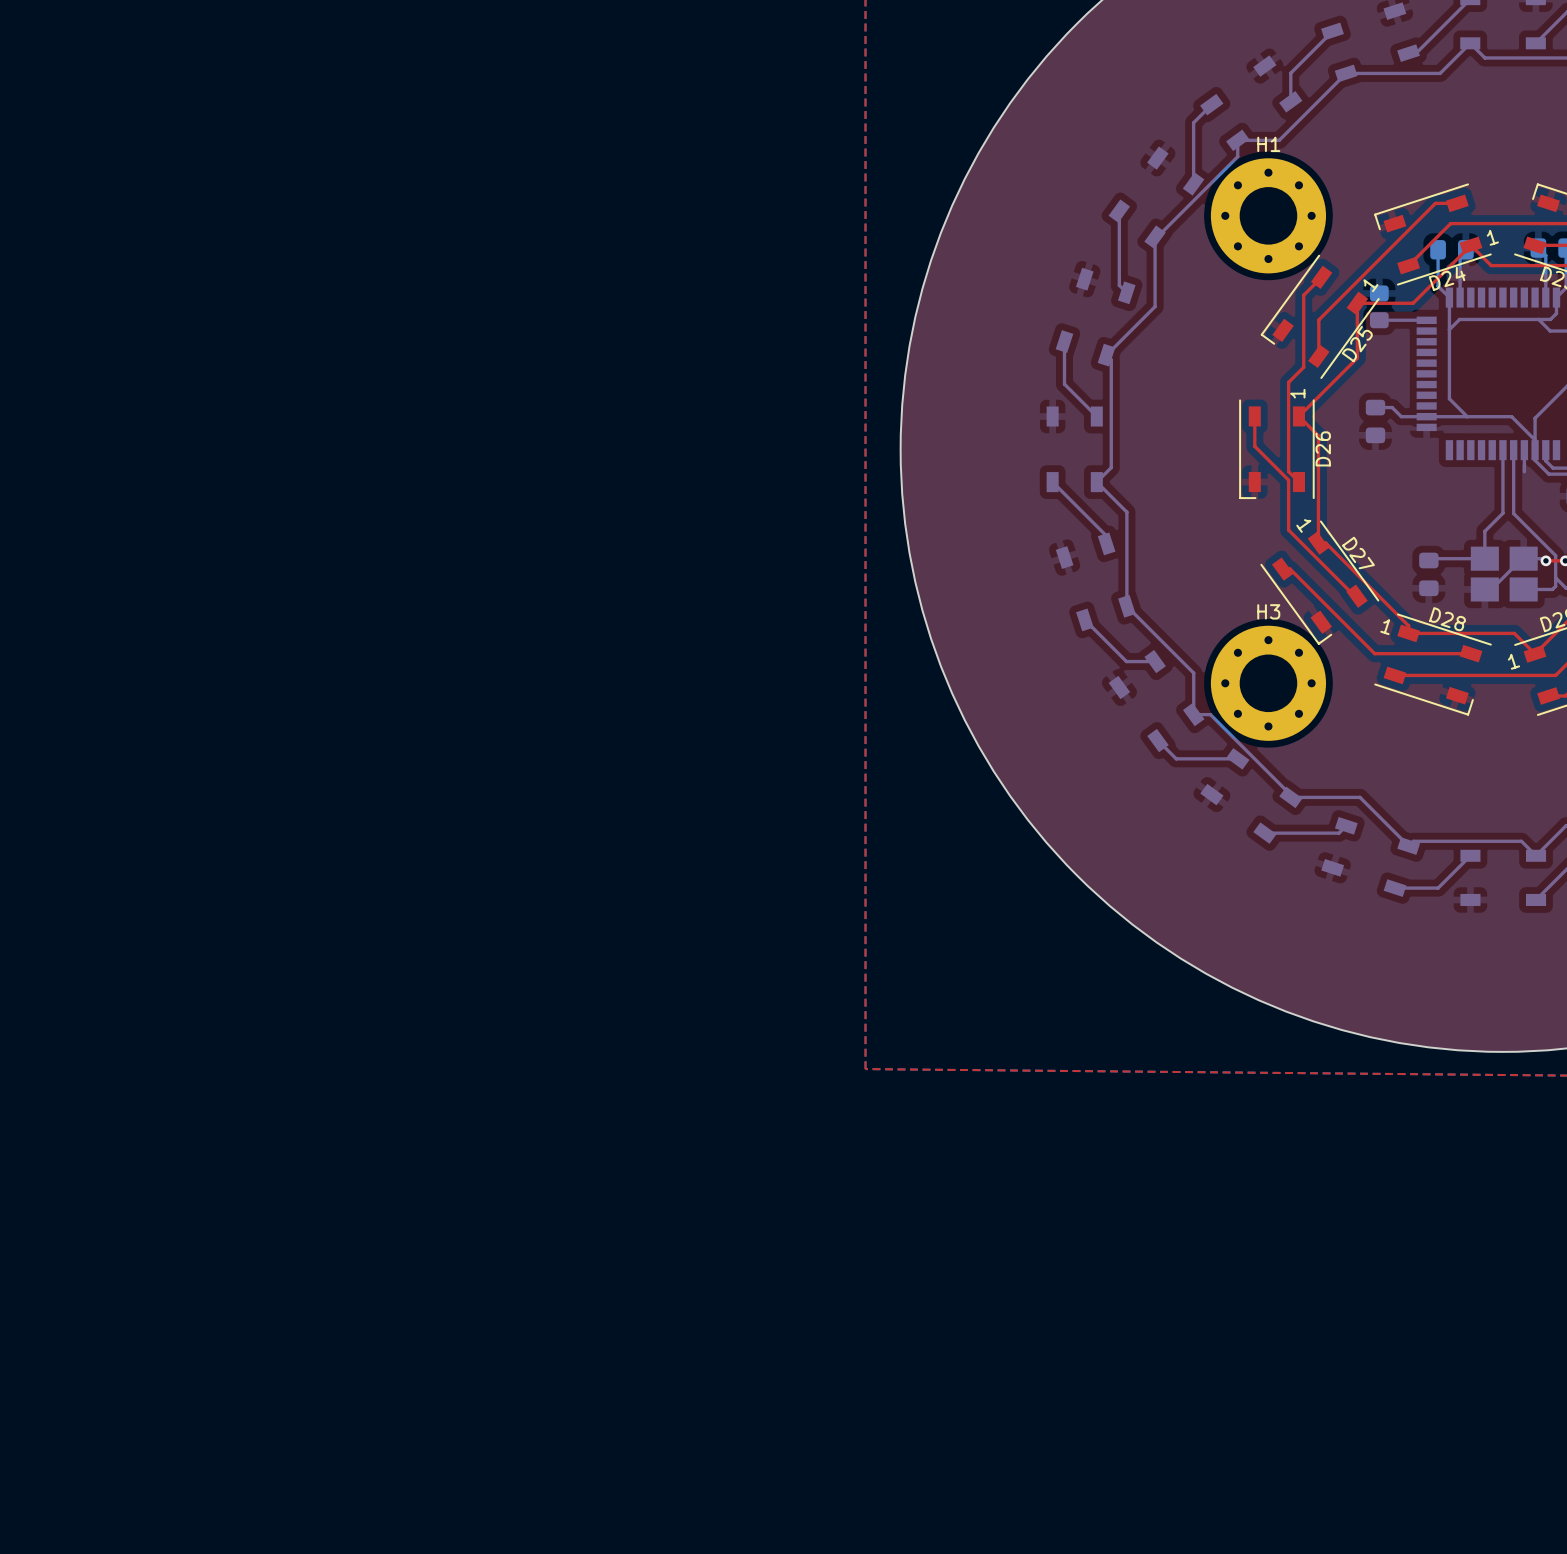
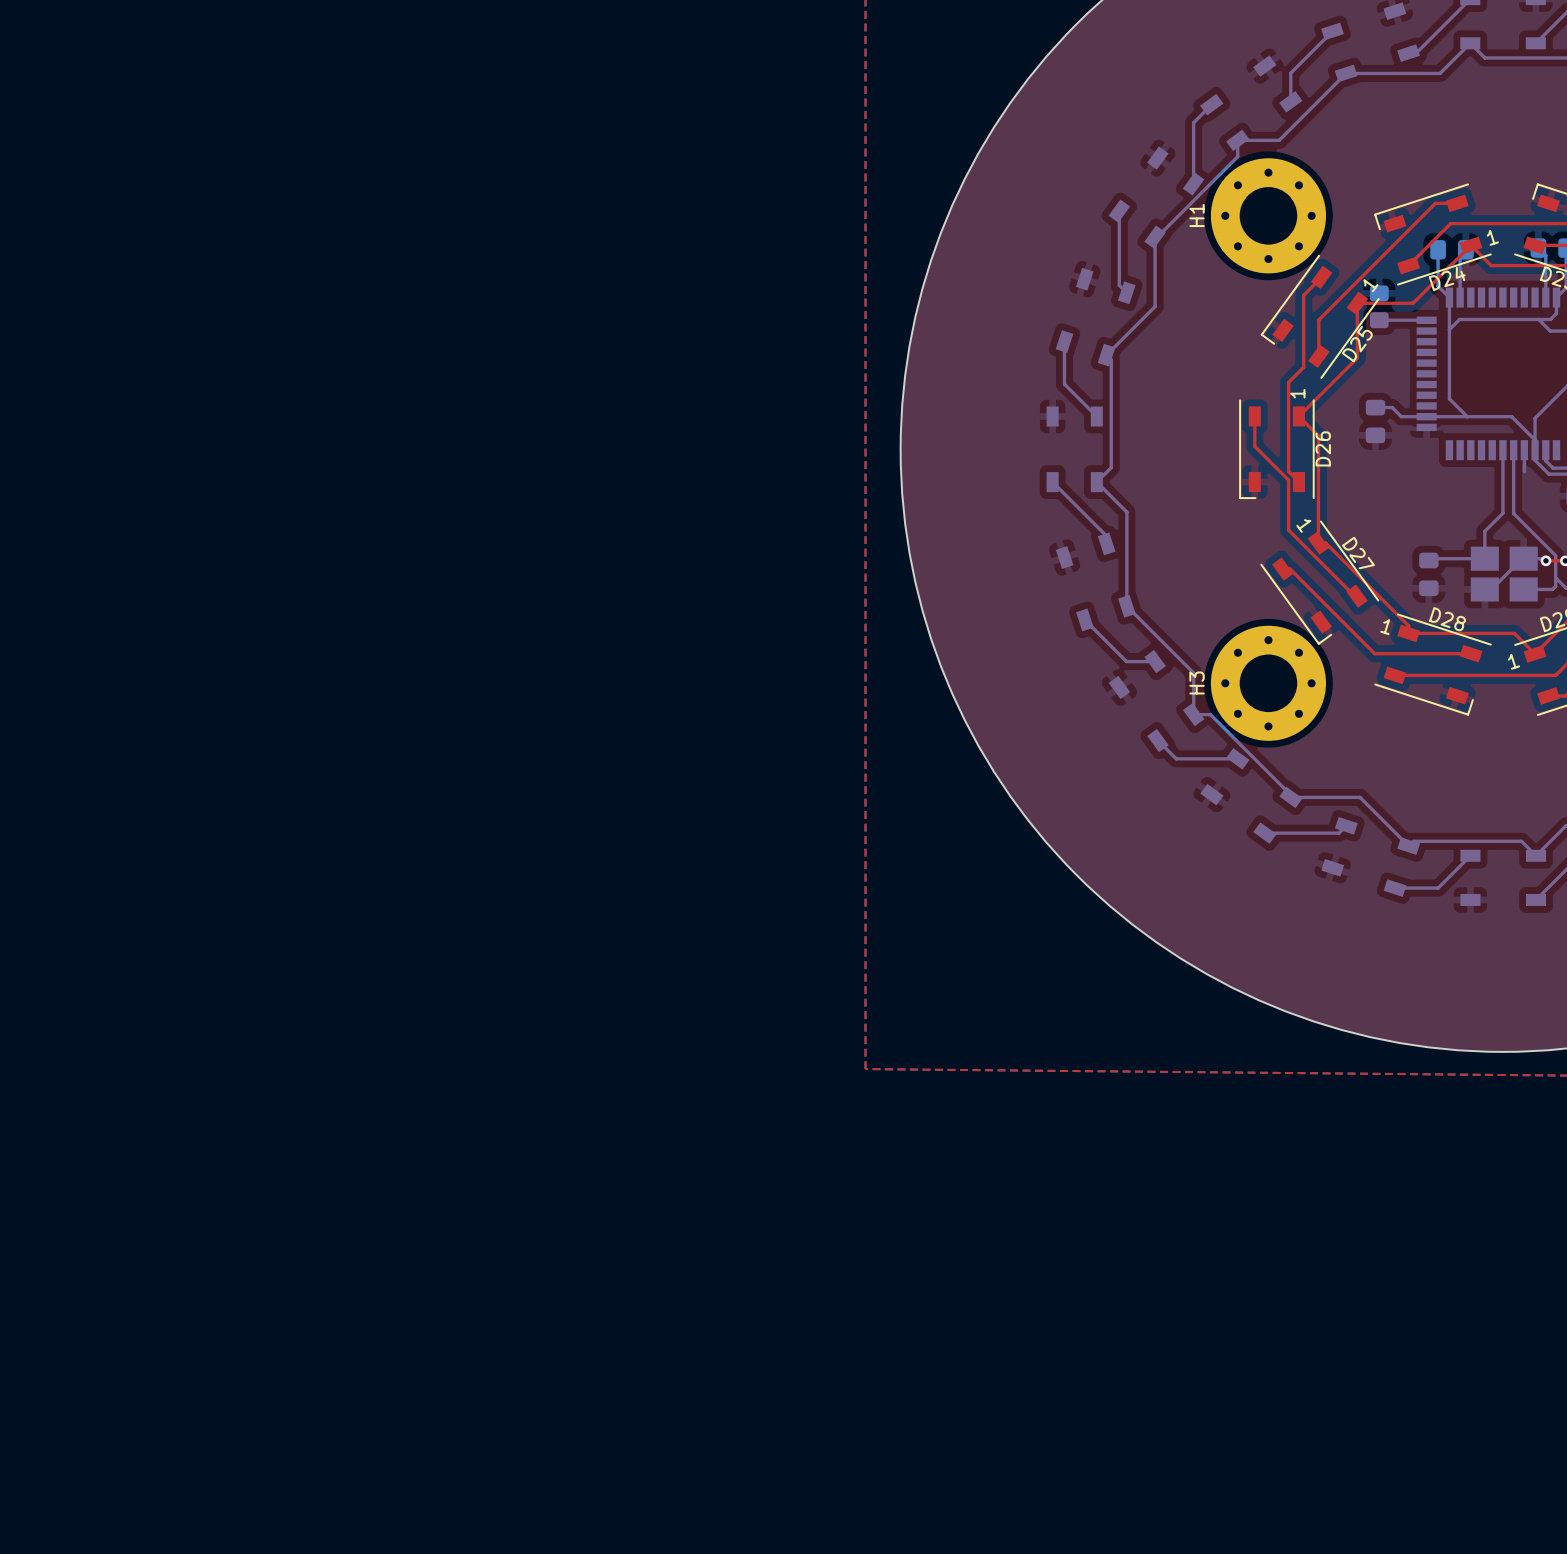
H1 name rotation: 0° (1268, 144) -> 90° counterclockwise (1197, 215)
H1 name position: H1 (1268, 144) -> H1 (1197, 215)
H3 name rotation: 0° (1268, 611) -> 90° counterclockwise (1197, 682)
H3 name position: H3 (1268, 611) -> H3 (1197, 682)

